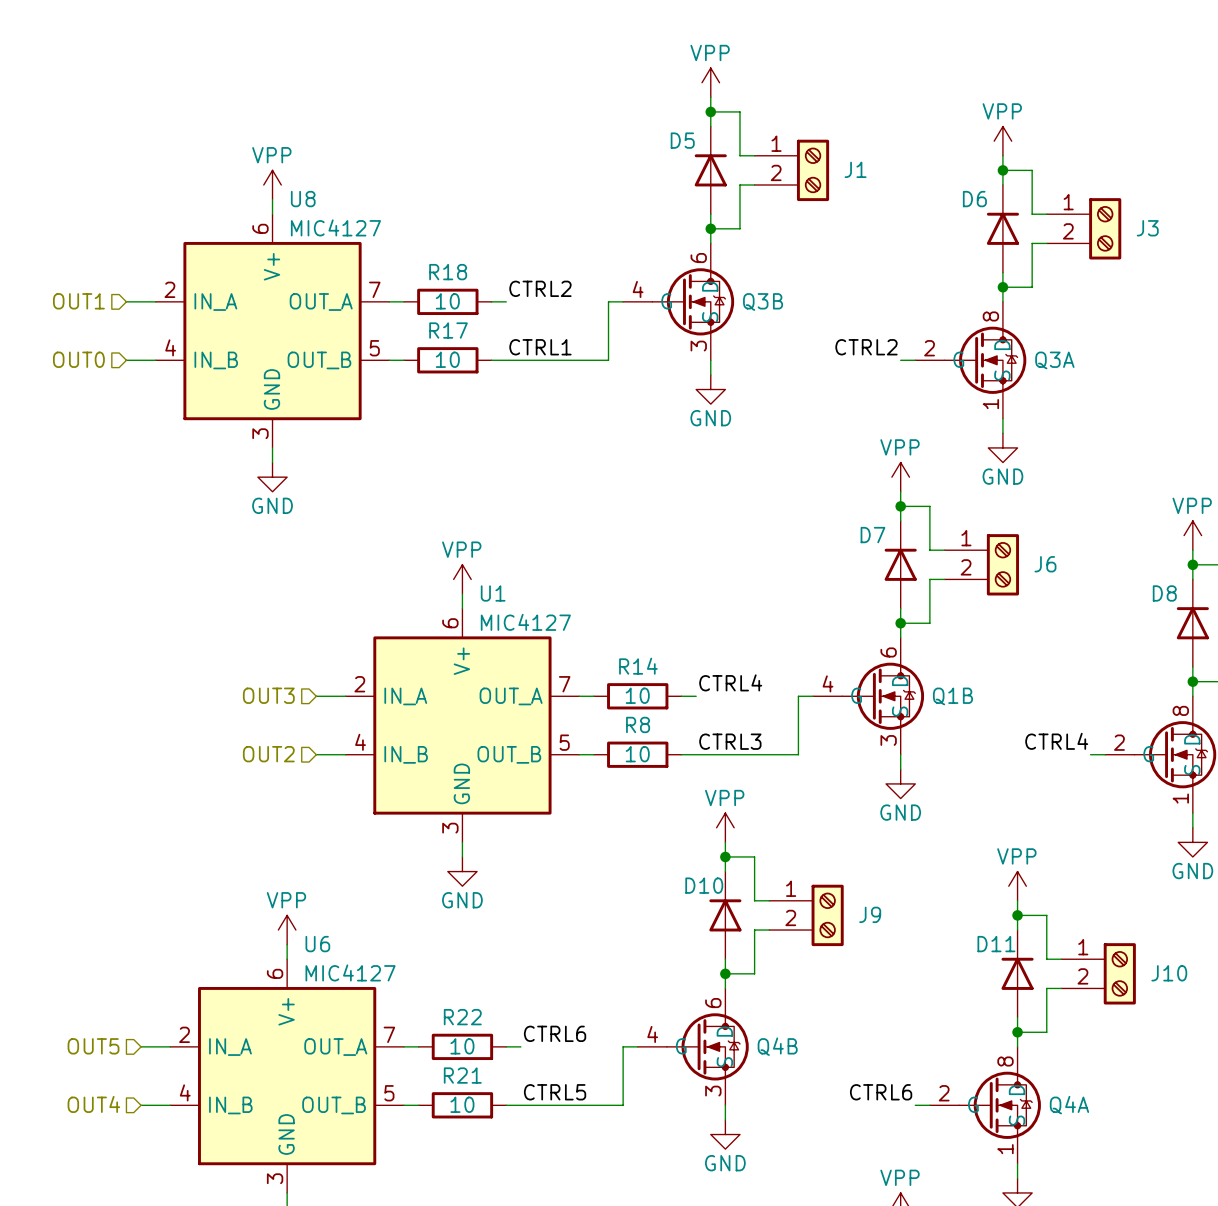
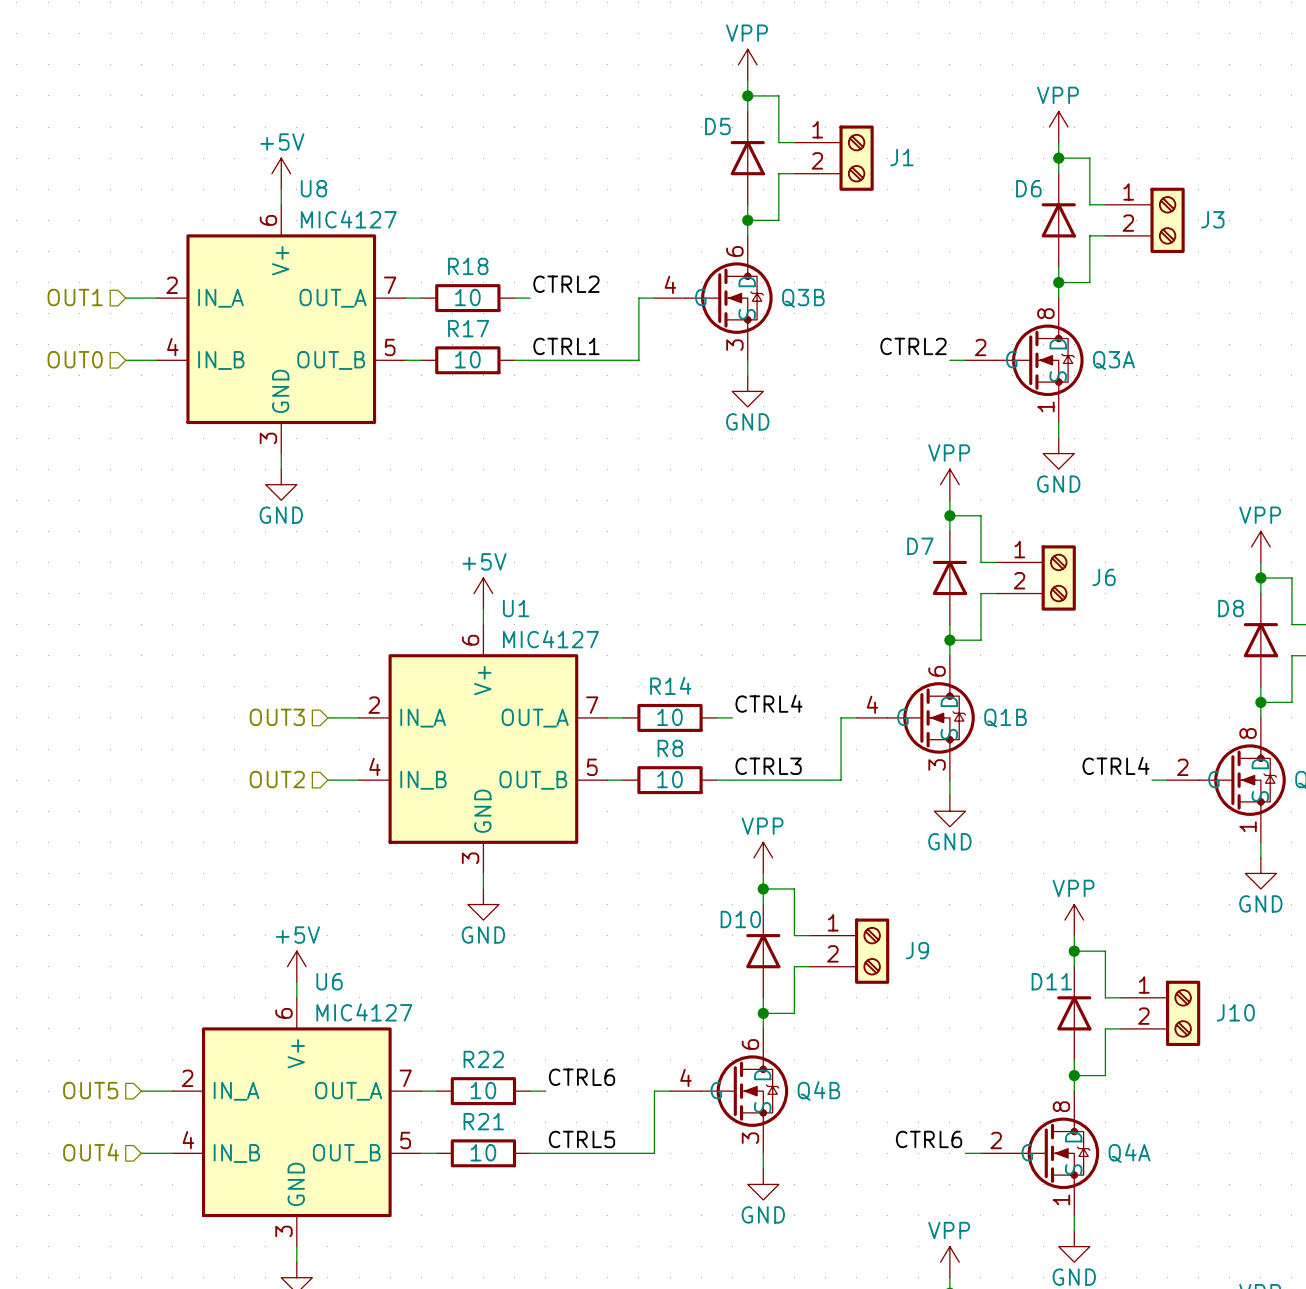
power symbol: VPP (272, 184) -> +5V (281, 173)
power symbol: VPP (462, 579) -> +5V (483, 593)
power symbol: VPP (287, 930) -> +5V (296, 966)

